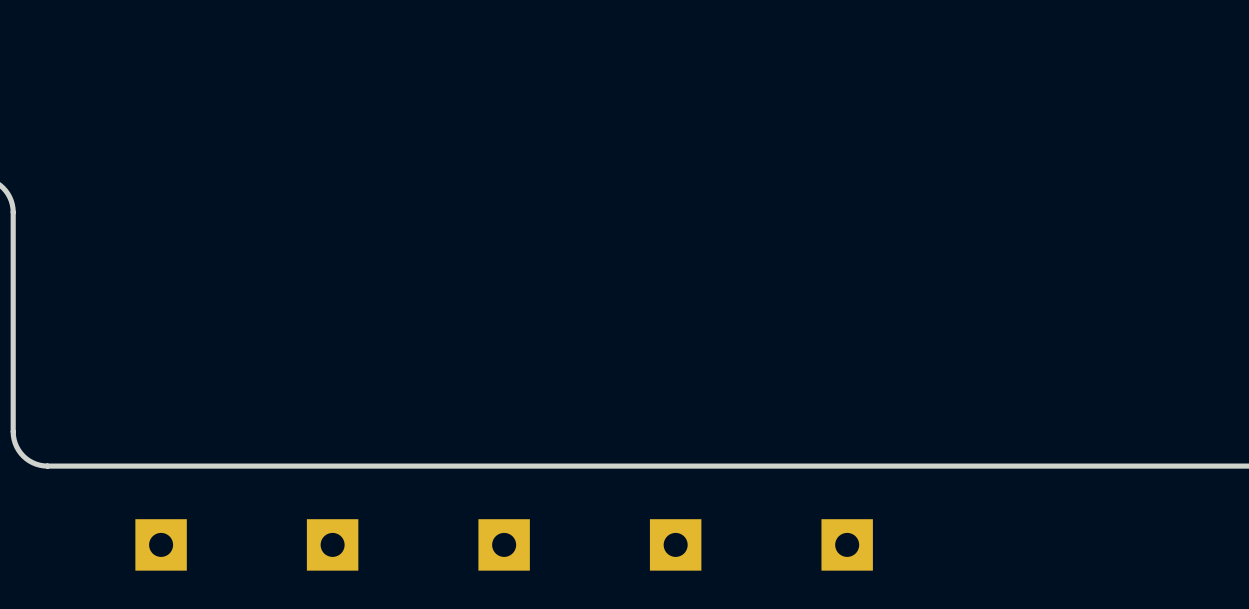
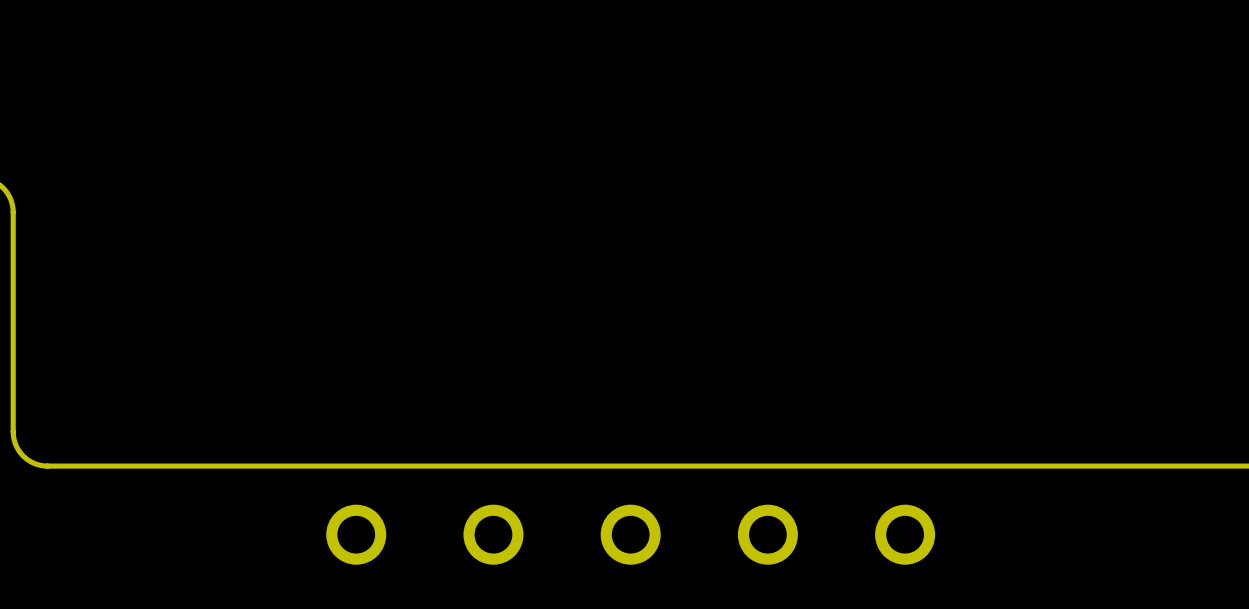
part: none -> (630, 534)
part: (161, 544) -> none
part: (332, 544) -> none
part: (504, 544) -> none
part: (675, 544) -> none
part: (847, 544) -> none

